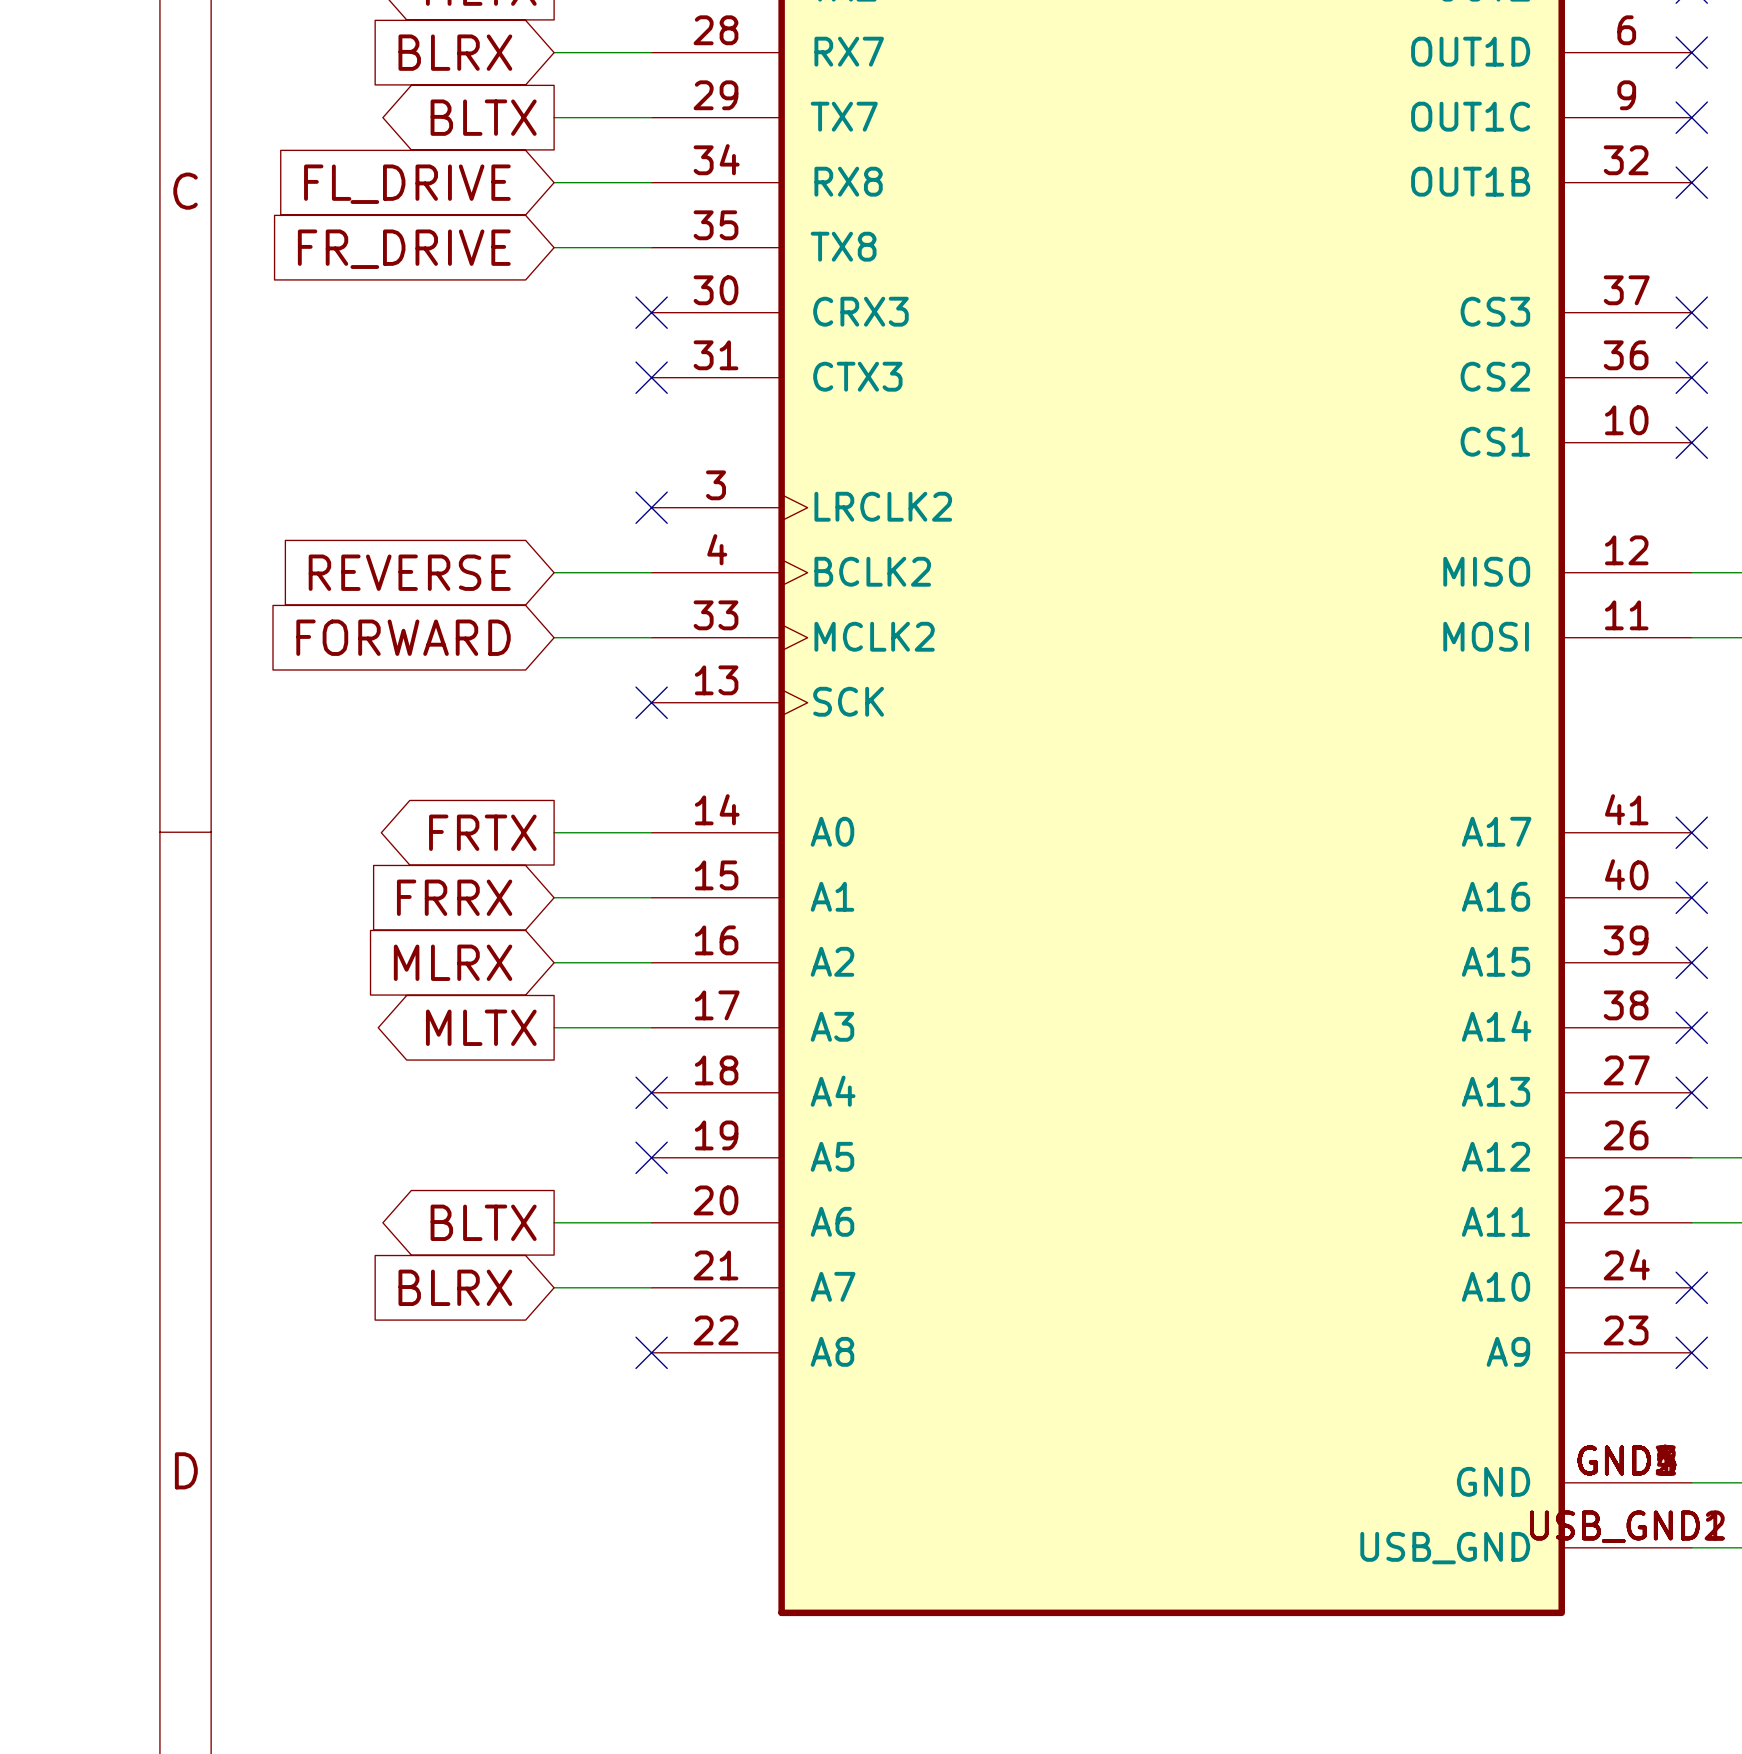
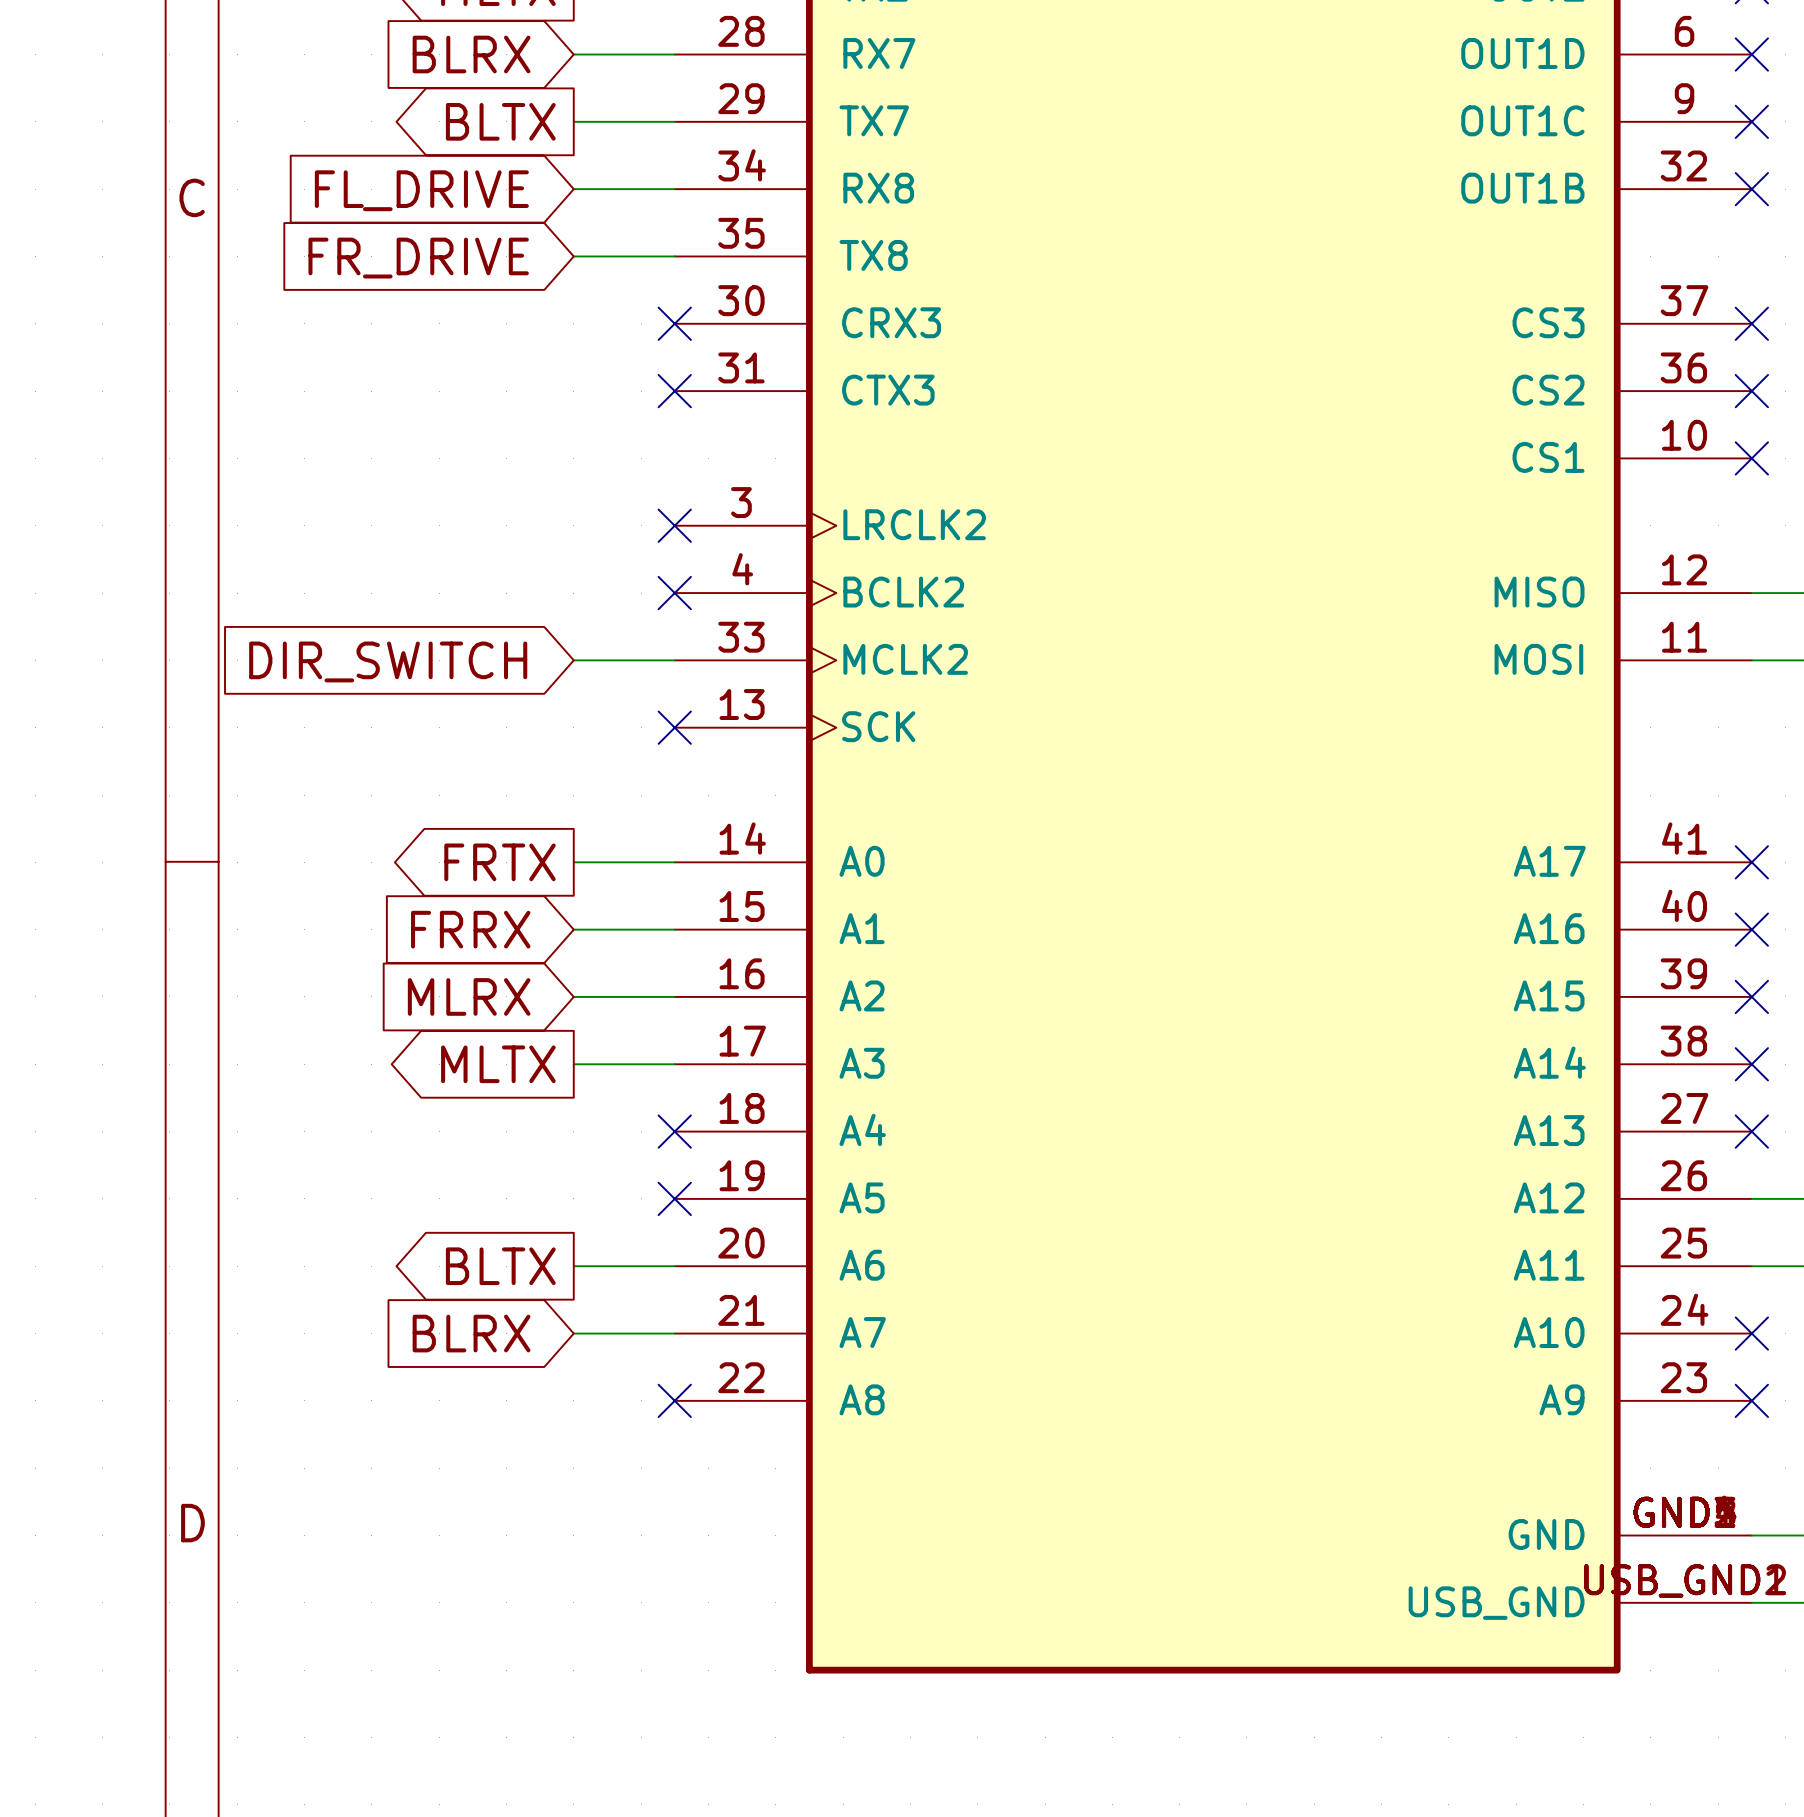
global label: REVERSE (409, 572) -> none
wire: (554, 572) (651, 572) -> none
no-connect mark: none -> (674, 593)
global label: FORWARD (403, 637) -> DIR_SWITCH (388, 661)

